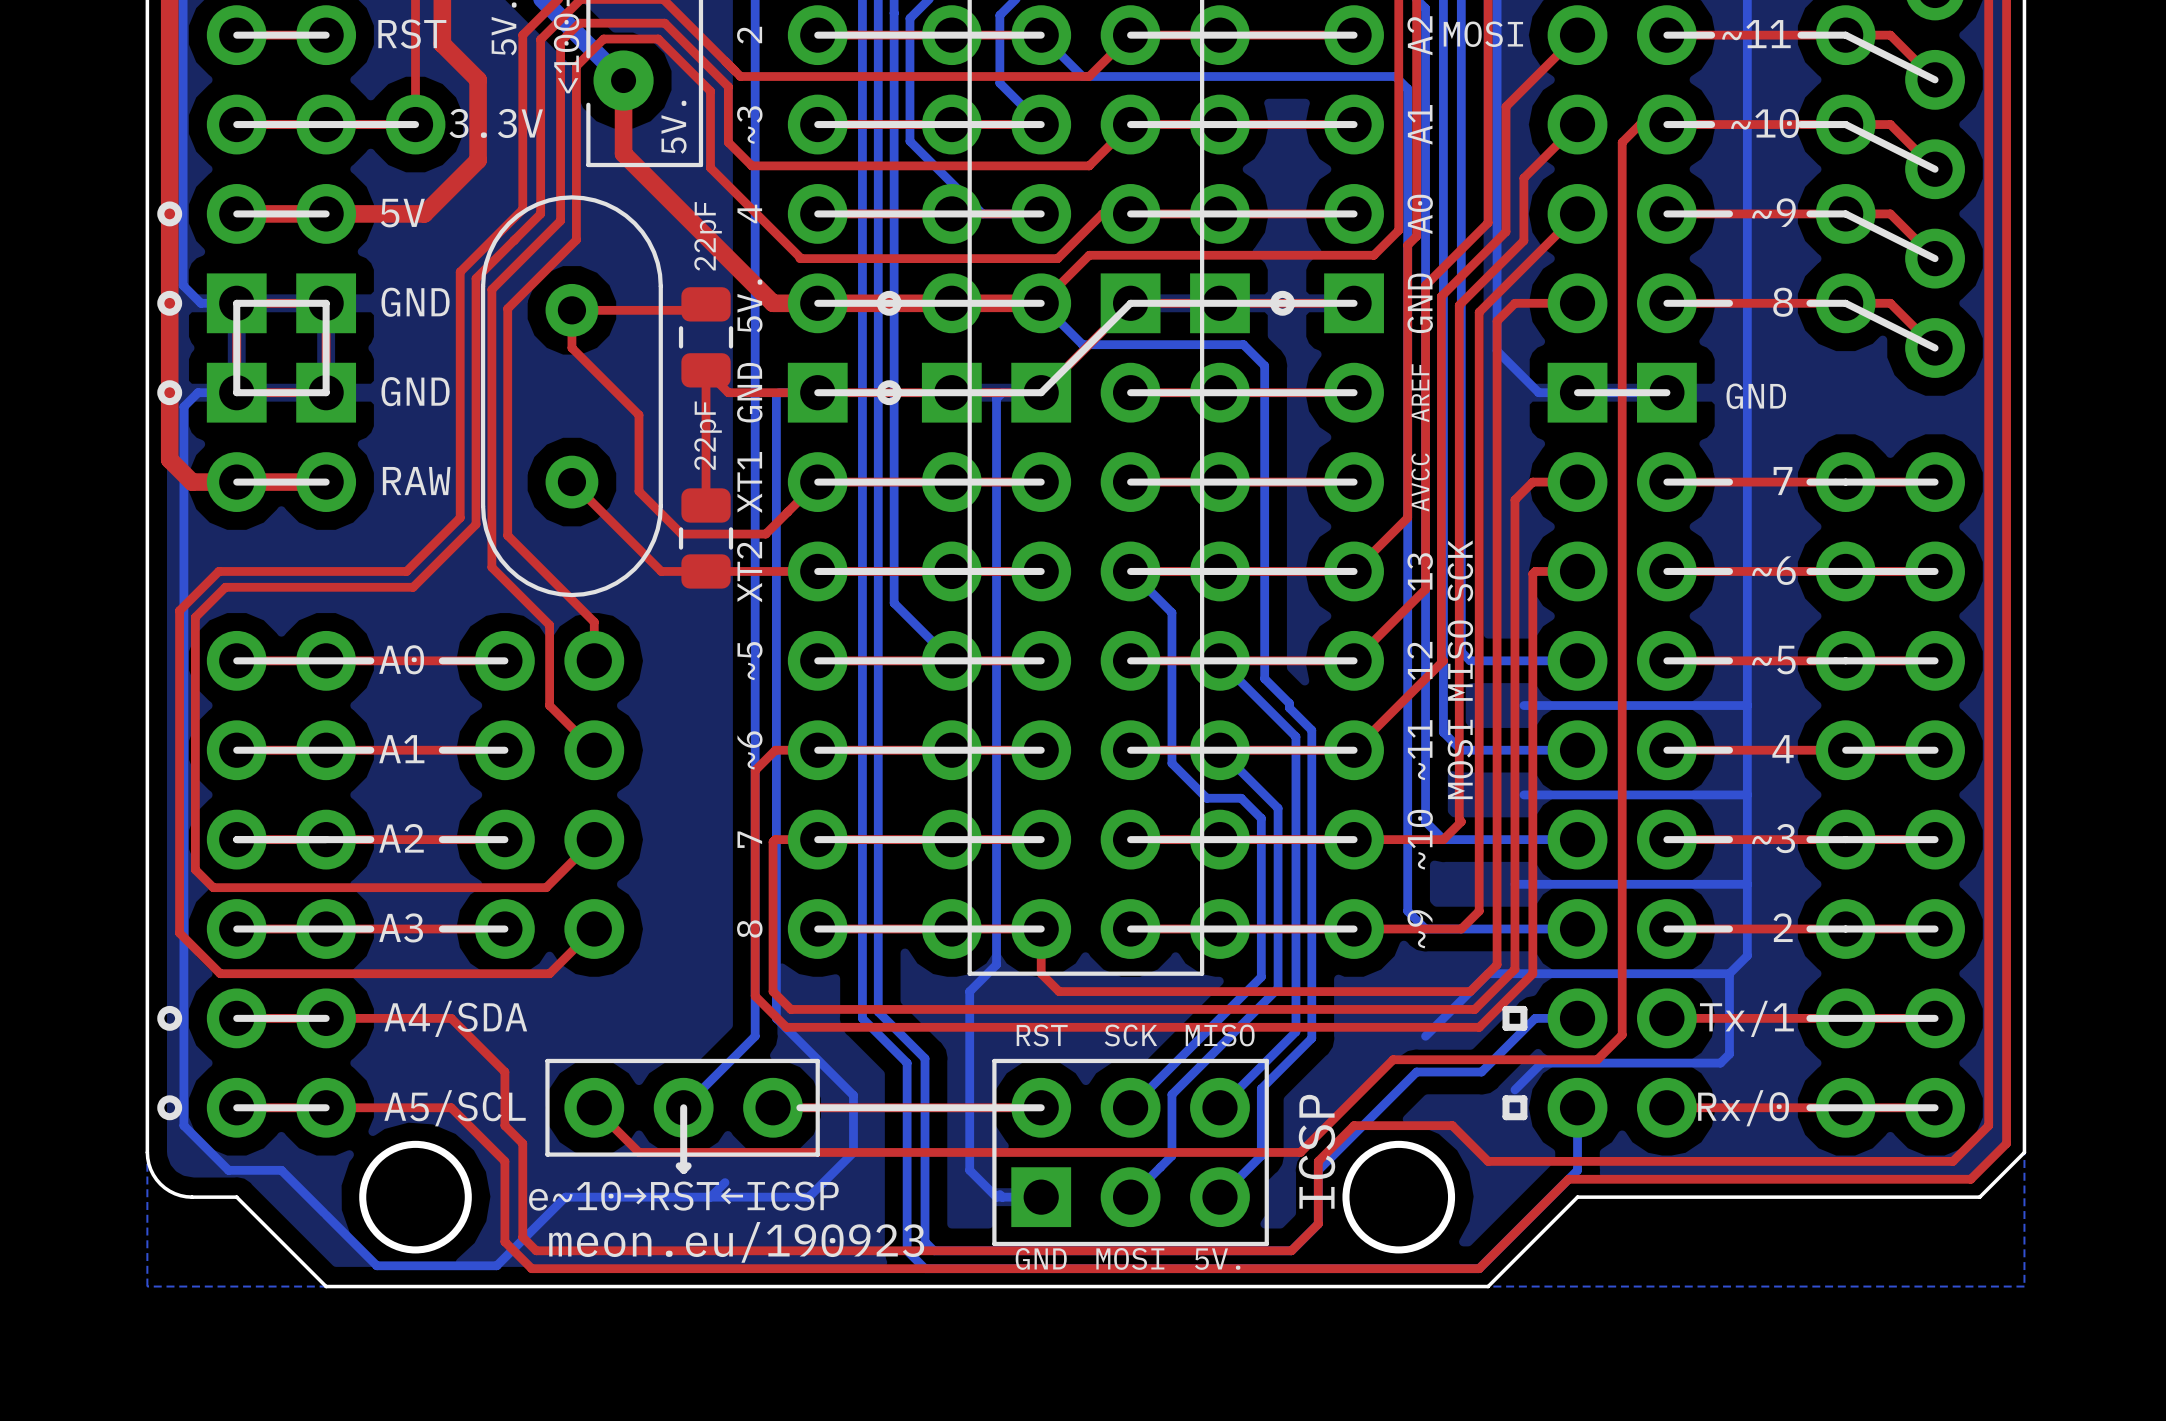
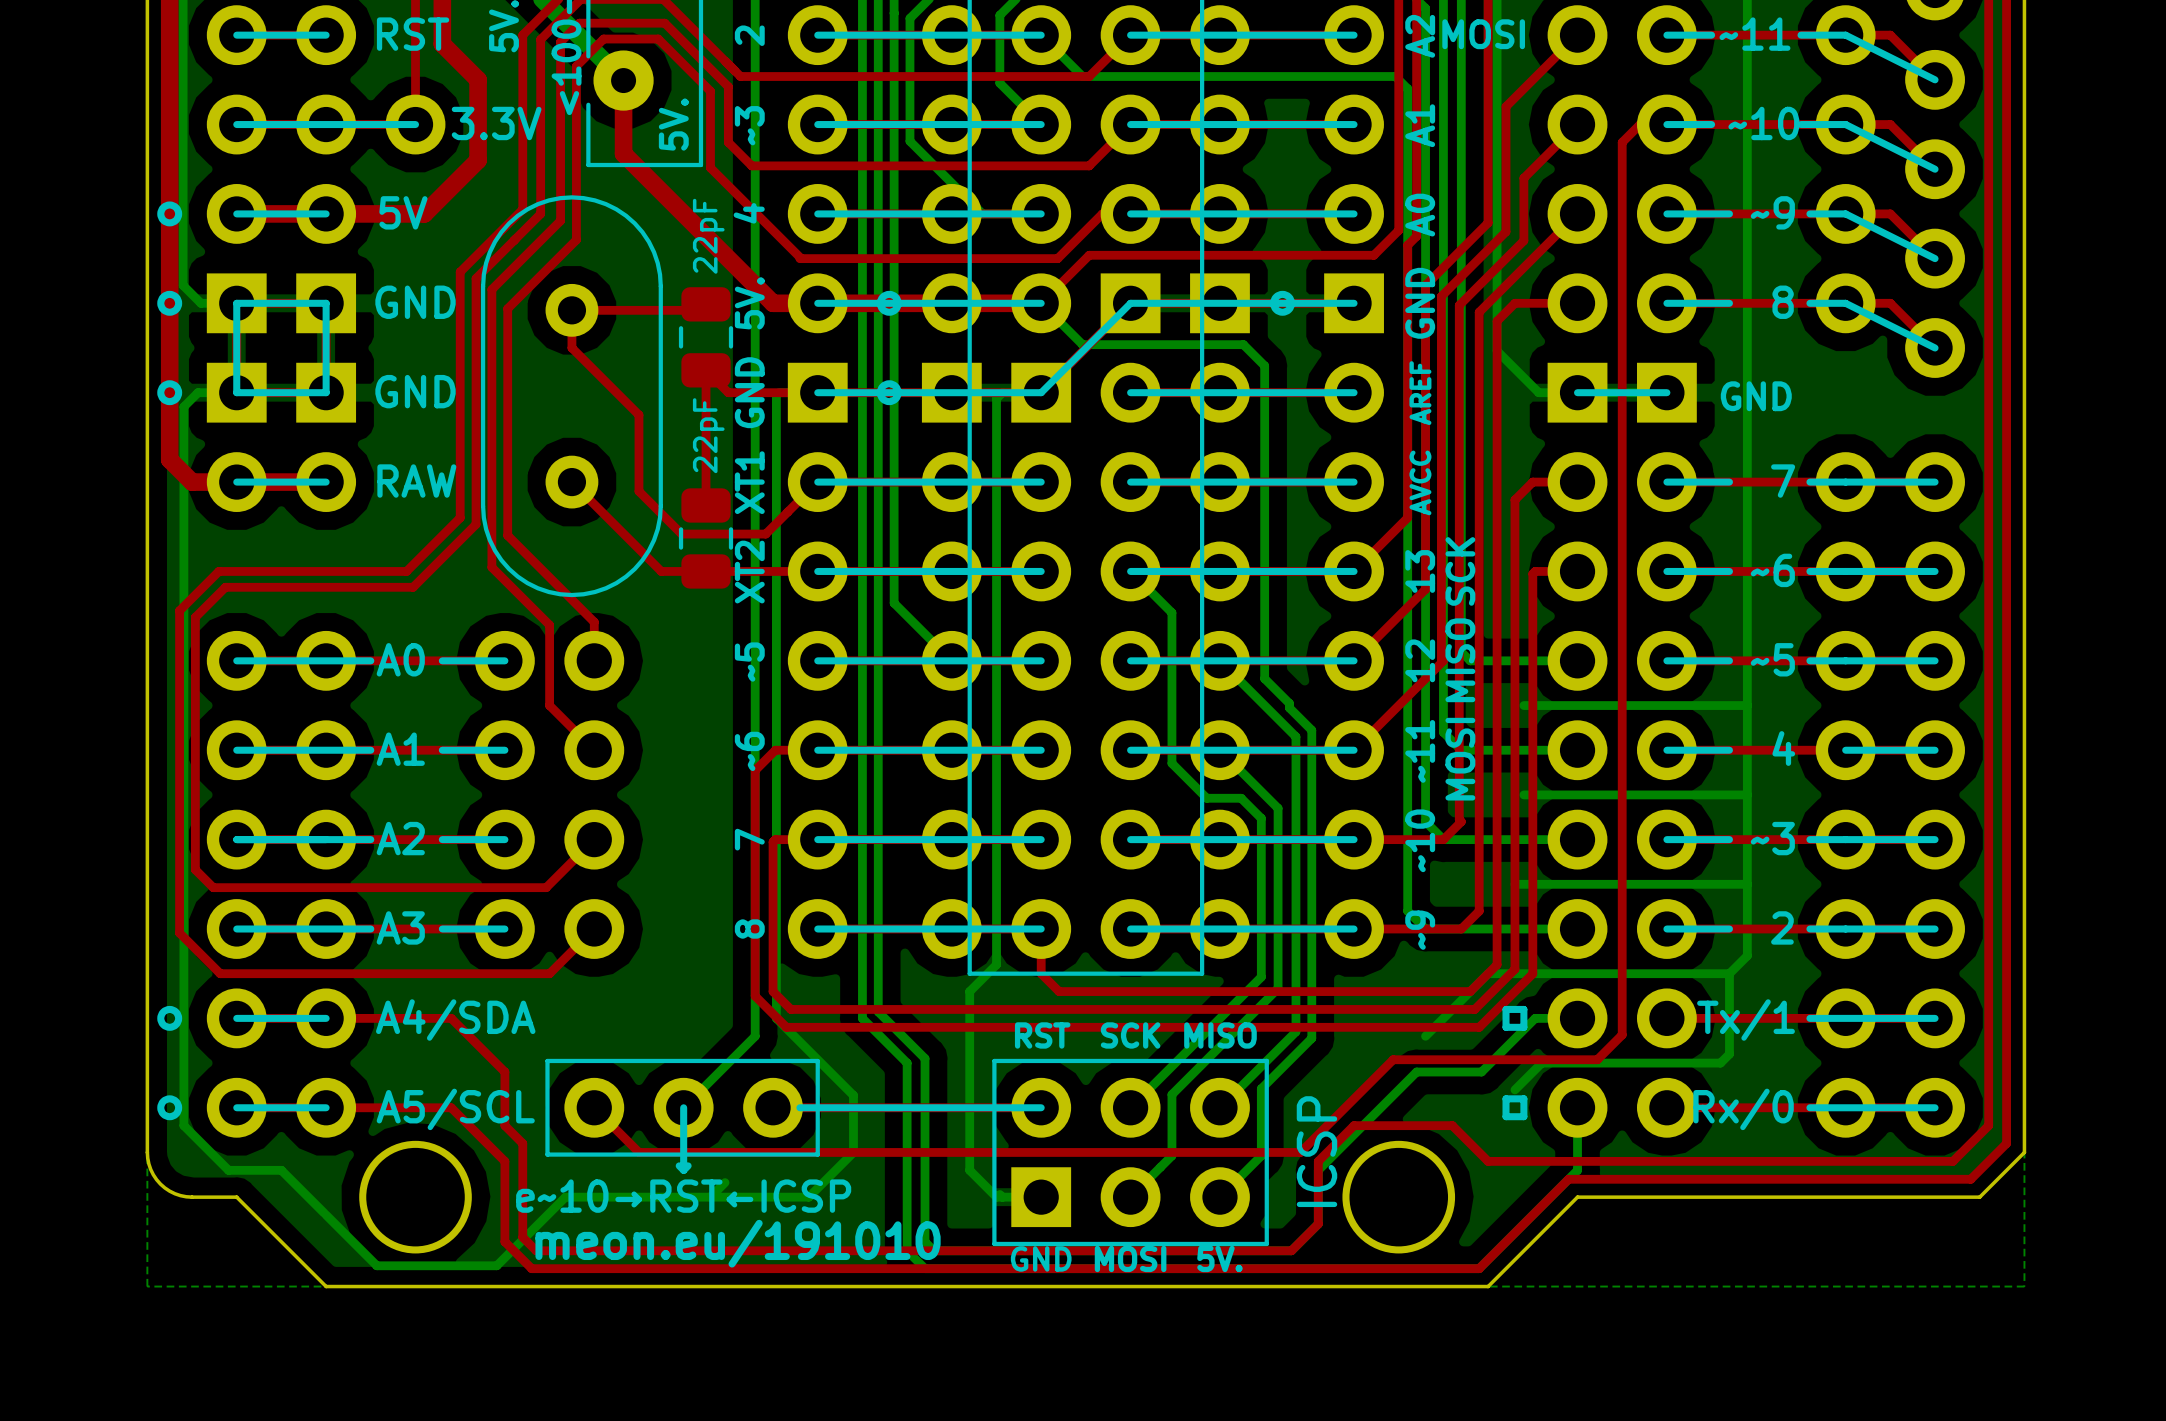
text: meon.eu/190923 (736, 1242) -> meon.eu/191010 (738, 1243)

